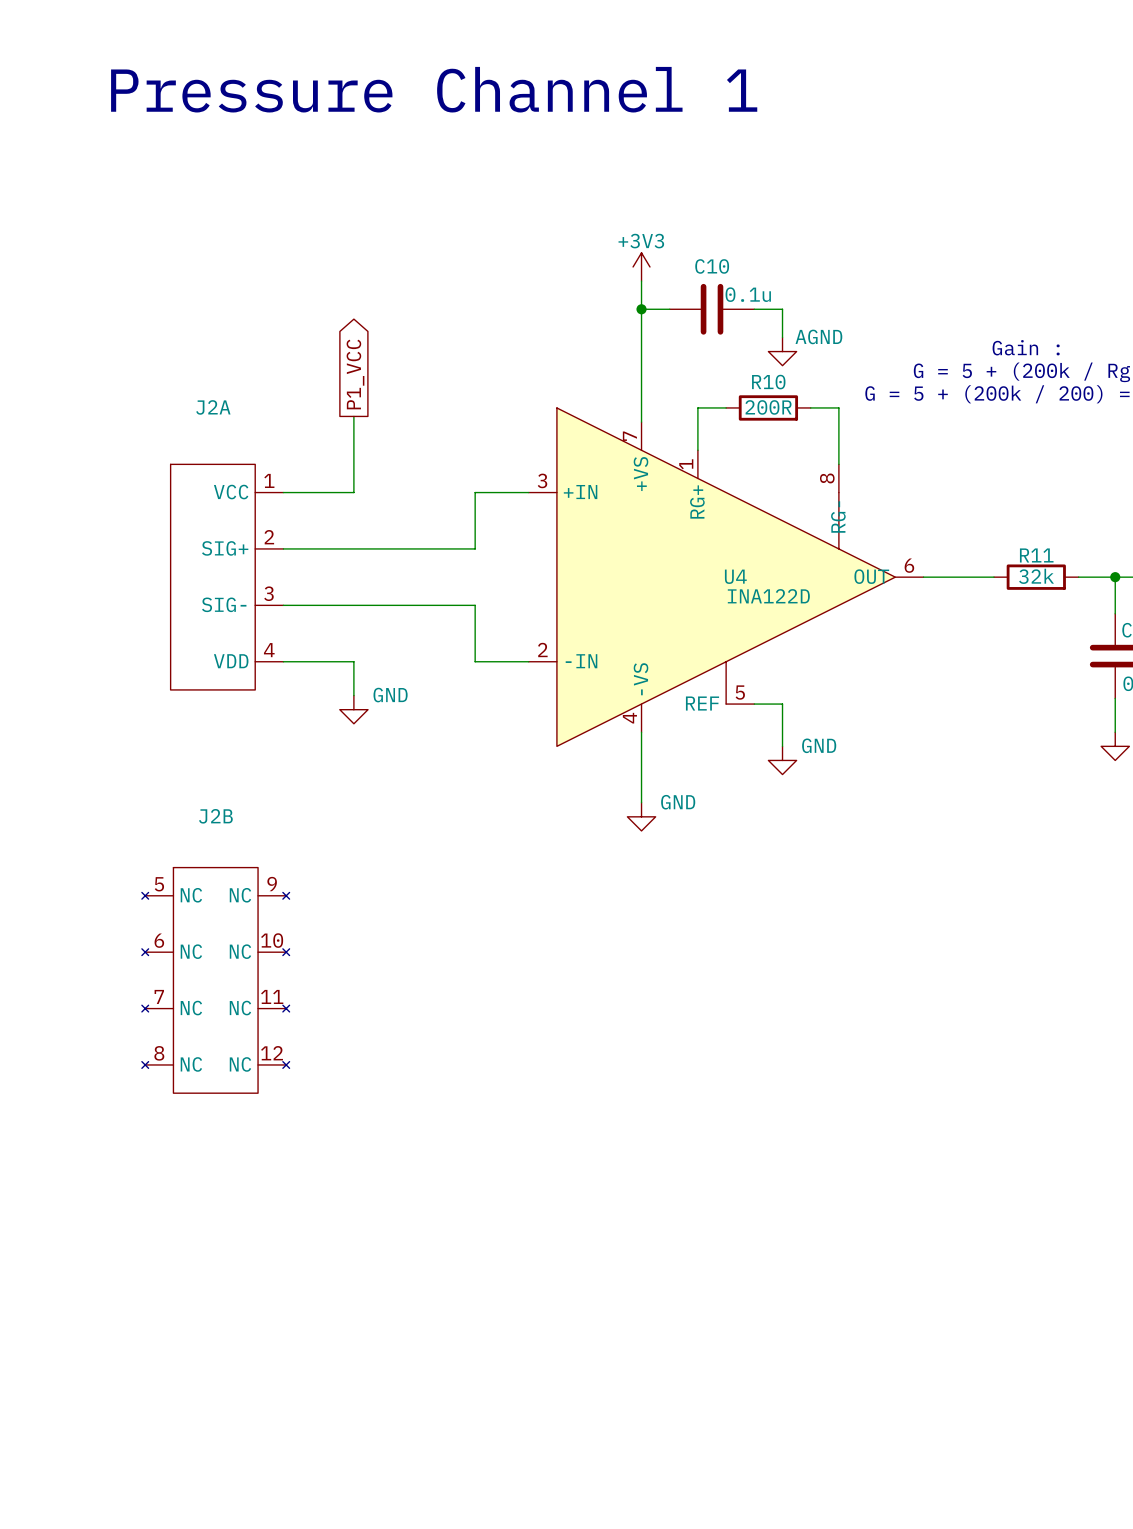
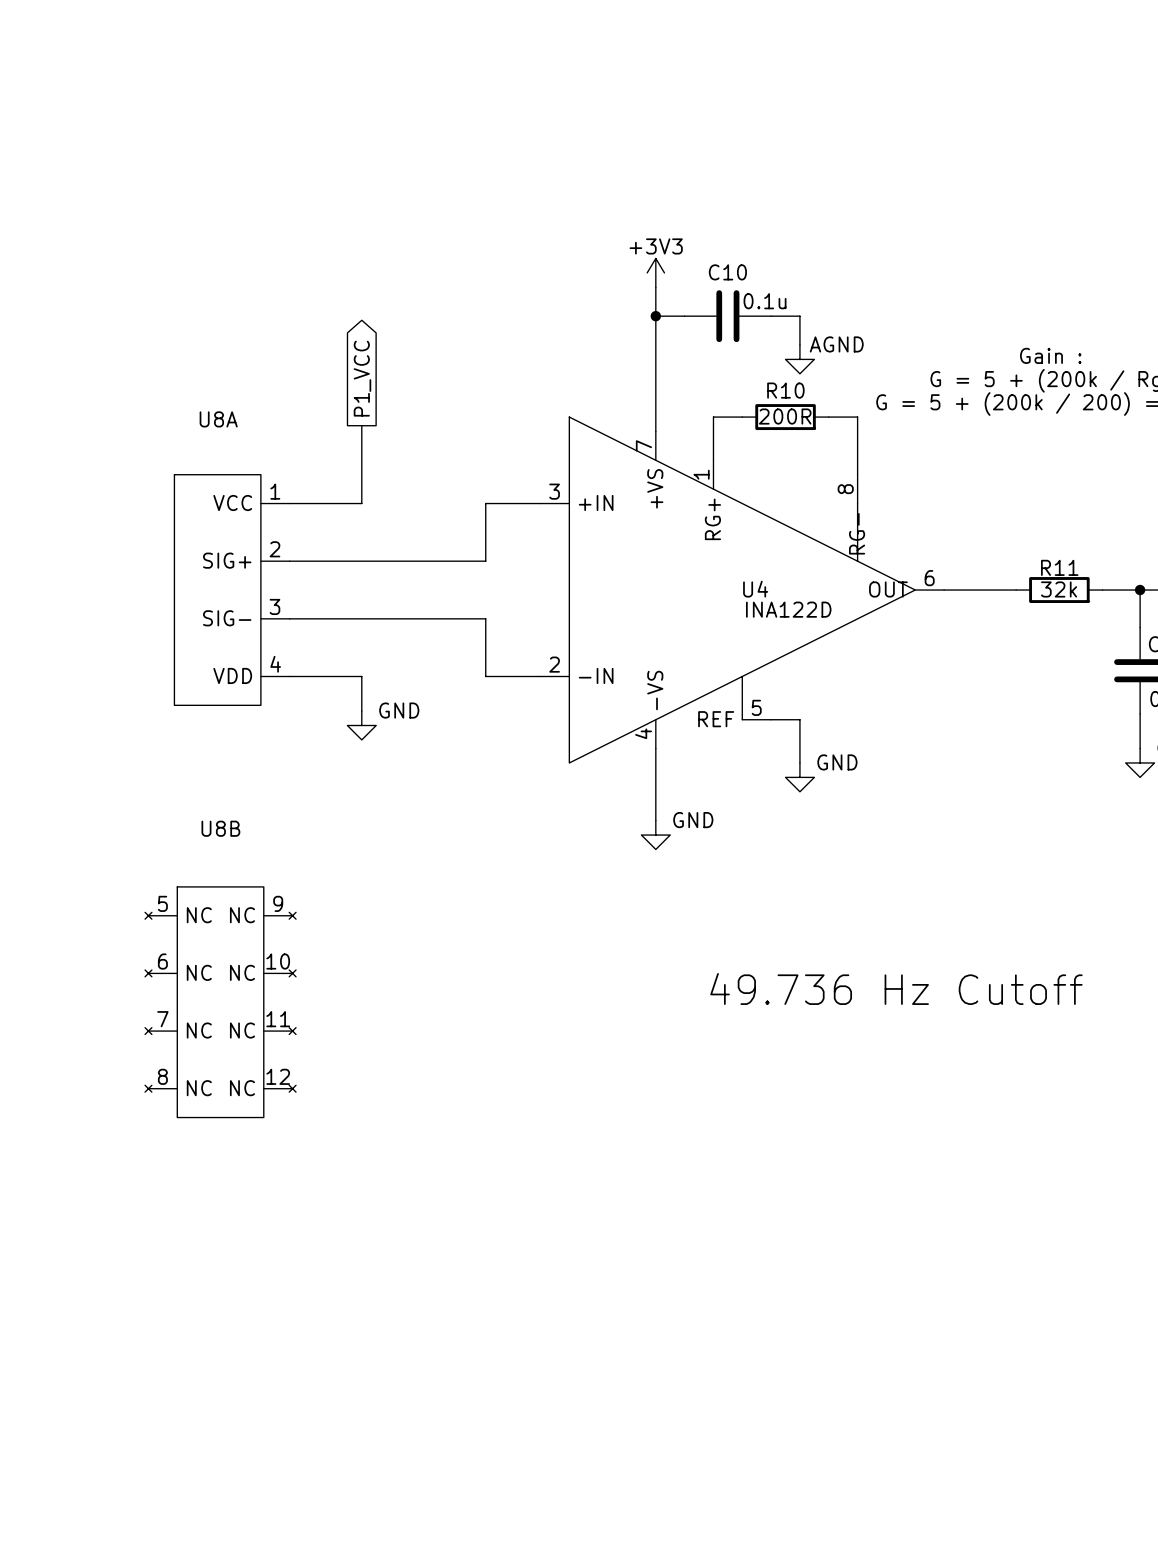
text: Pressure Channel 1 (434, 89) -> none
J2A name: J2A (213, 407) -> U8A (218, 419)
J2B name: J2B (215, 816) -> U8B (220, 828)
text: none -> 49.736 Hz Cutoff (896, 988)

